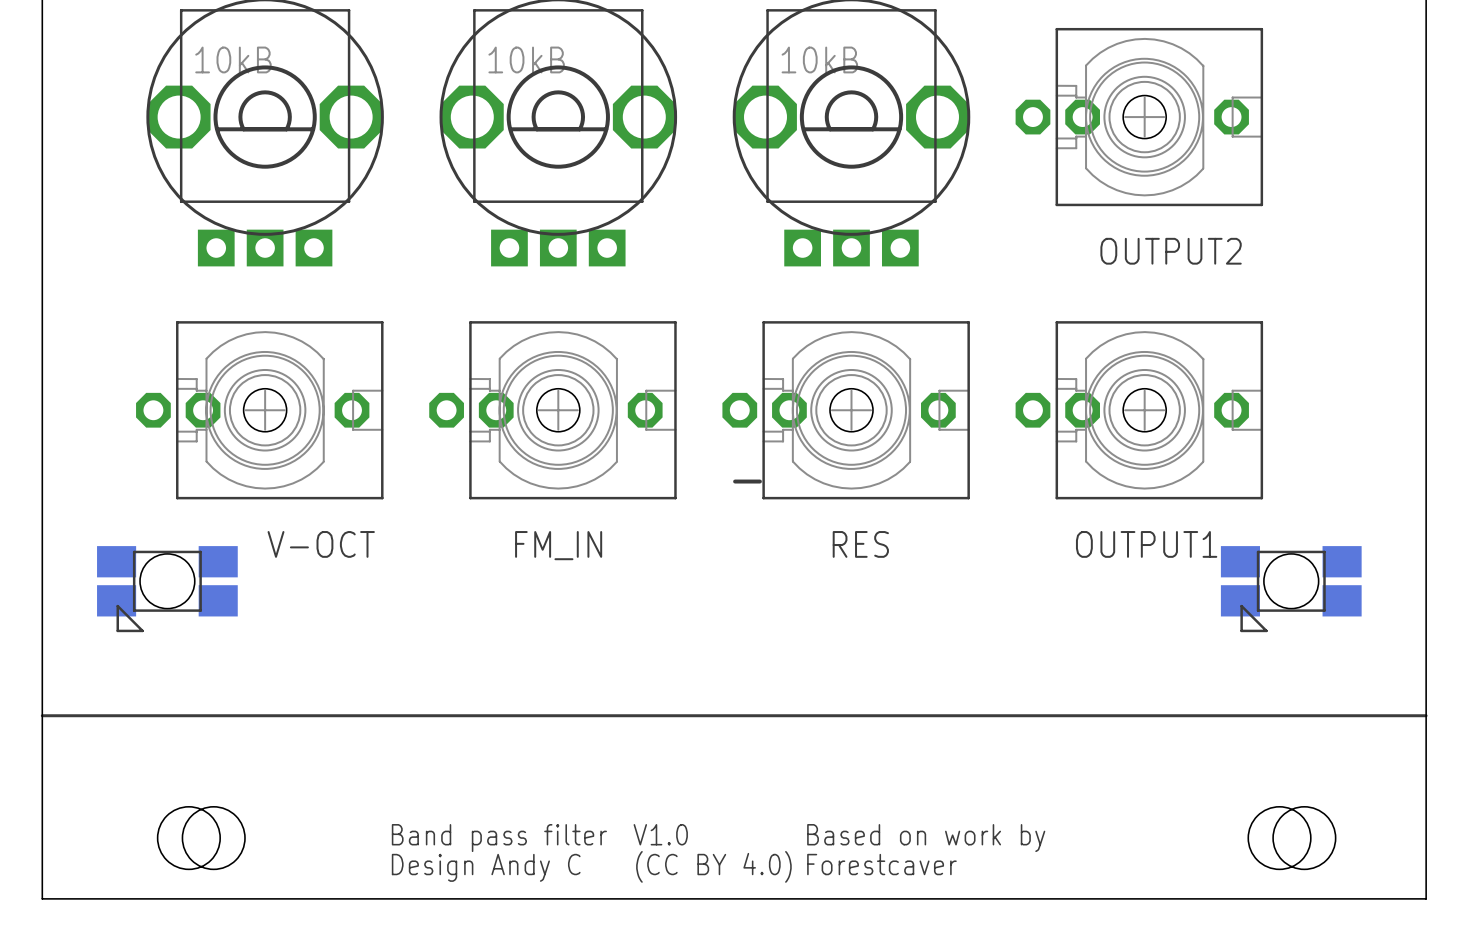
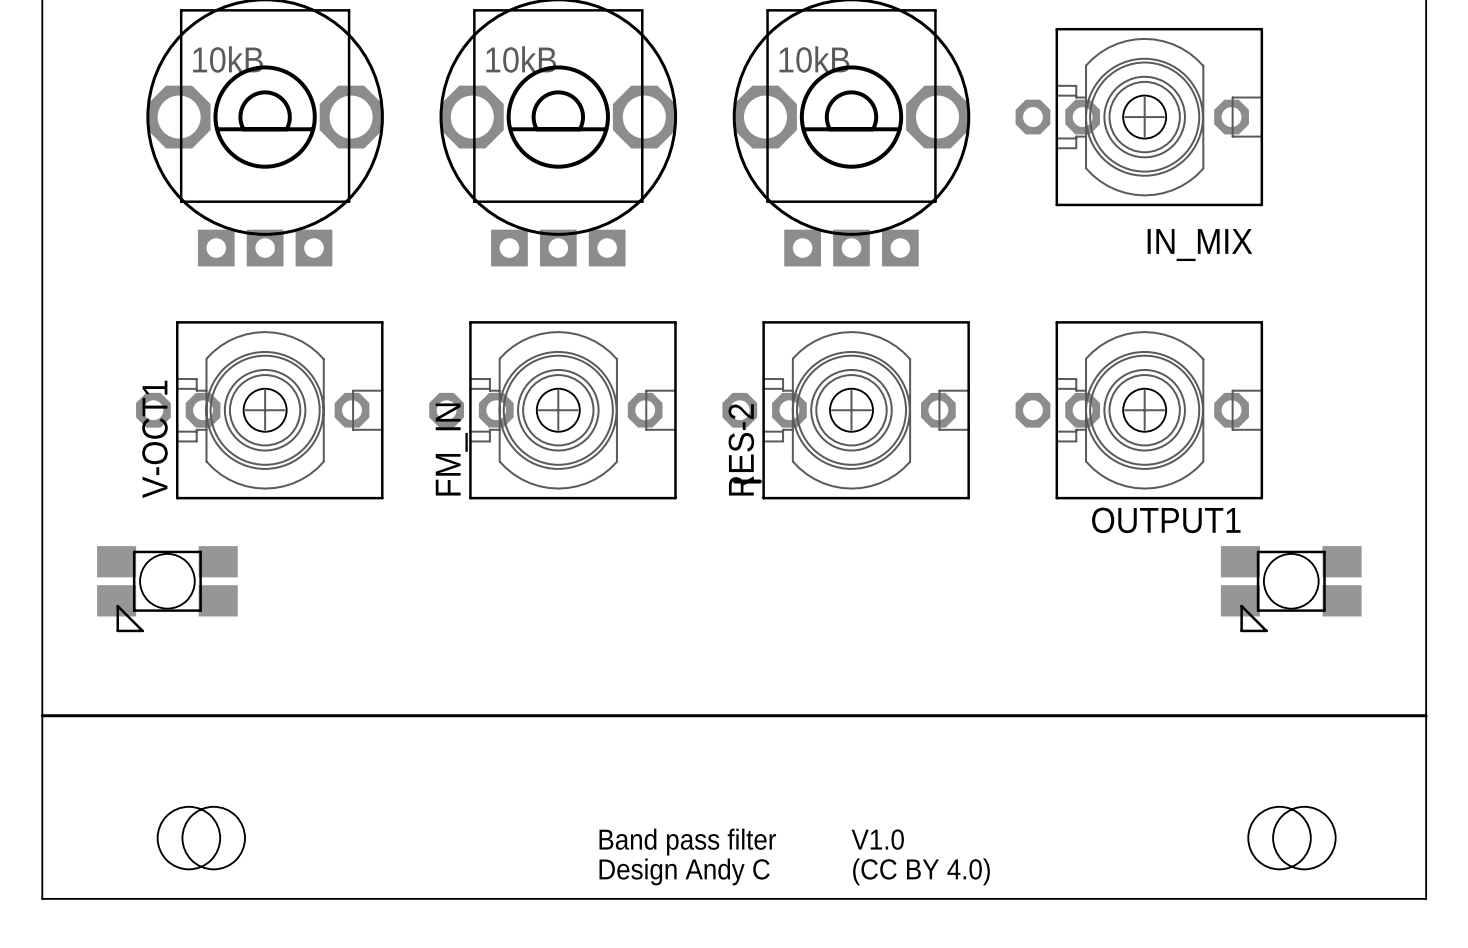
OUTPUT2 name: OUTPUT2 (1171, 251) -> IN_MIX (1199, 245)
V-OCT name: V-OCT (321, 544) -> V-OCT1 (154, 439)
RES name: RES (860, 544) -> RES-2 (741, 449)
OUTPUT1 name position: OUTPUT1 (1146, 544) -> OUTPUT1 (1166, 520)
FM_IN name rotation: 0° (558, 545) -> 90° counterclockwise (451, 449)
FM_IN name position: FM_IN (558, 545) -> FM_IN (451, 449)
text position: V1.0 (660, 834) -> V1.0 (877, 839)
text position: Band pass filter (499, 838) -> Band pass filter (687, 842)
text: Based on work by (926, 838) -> none
text: Forestcaver (881, 864) -> none
text position: (CC BY 4.0) (713, 866) -> (CC BY 4.0) (921, 871)
text position: Design Andy C (486, 867) -> Design Andy C (684, 871)

